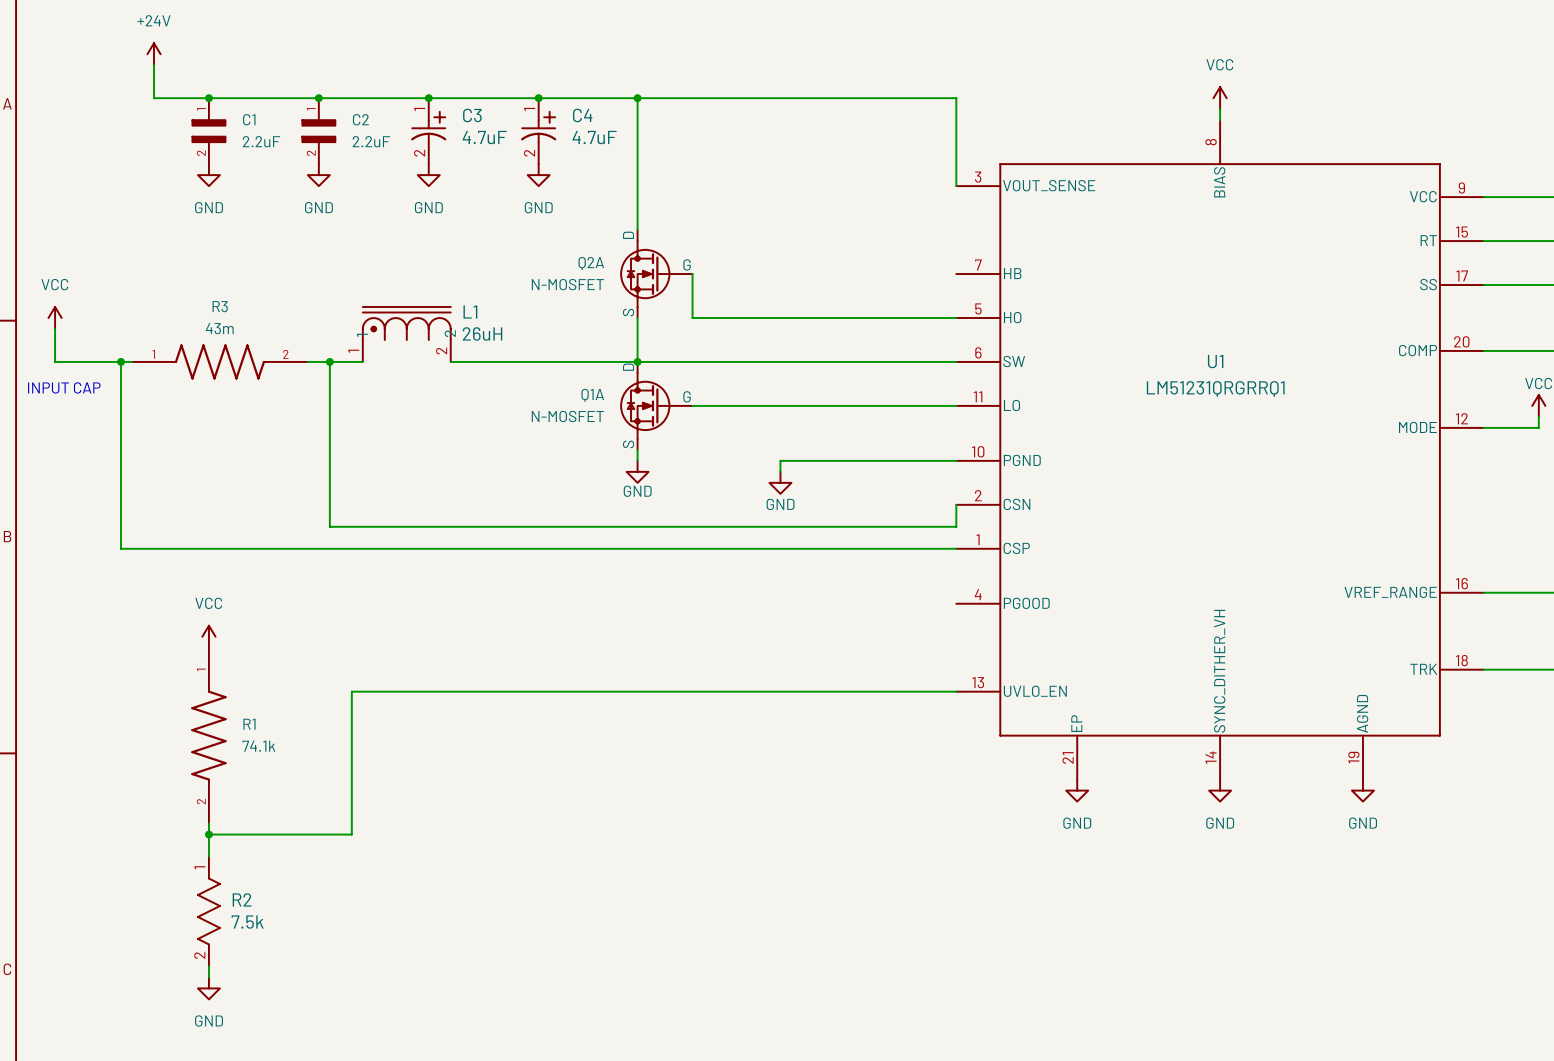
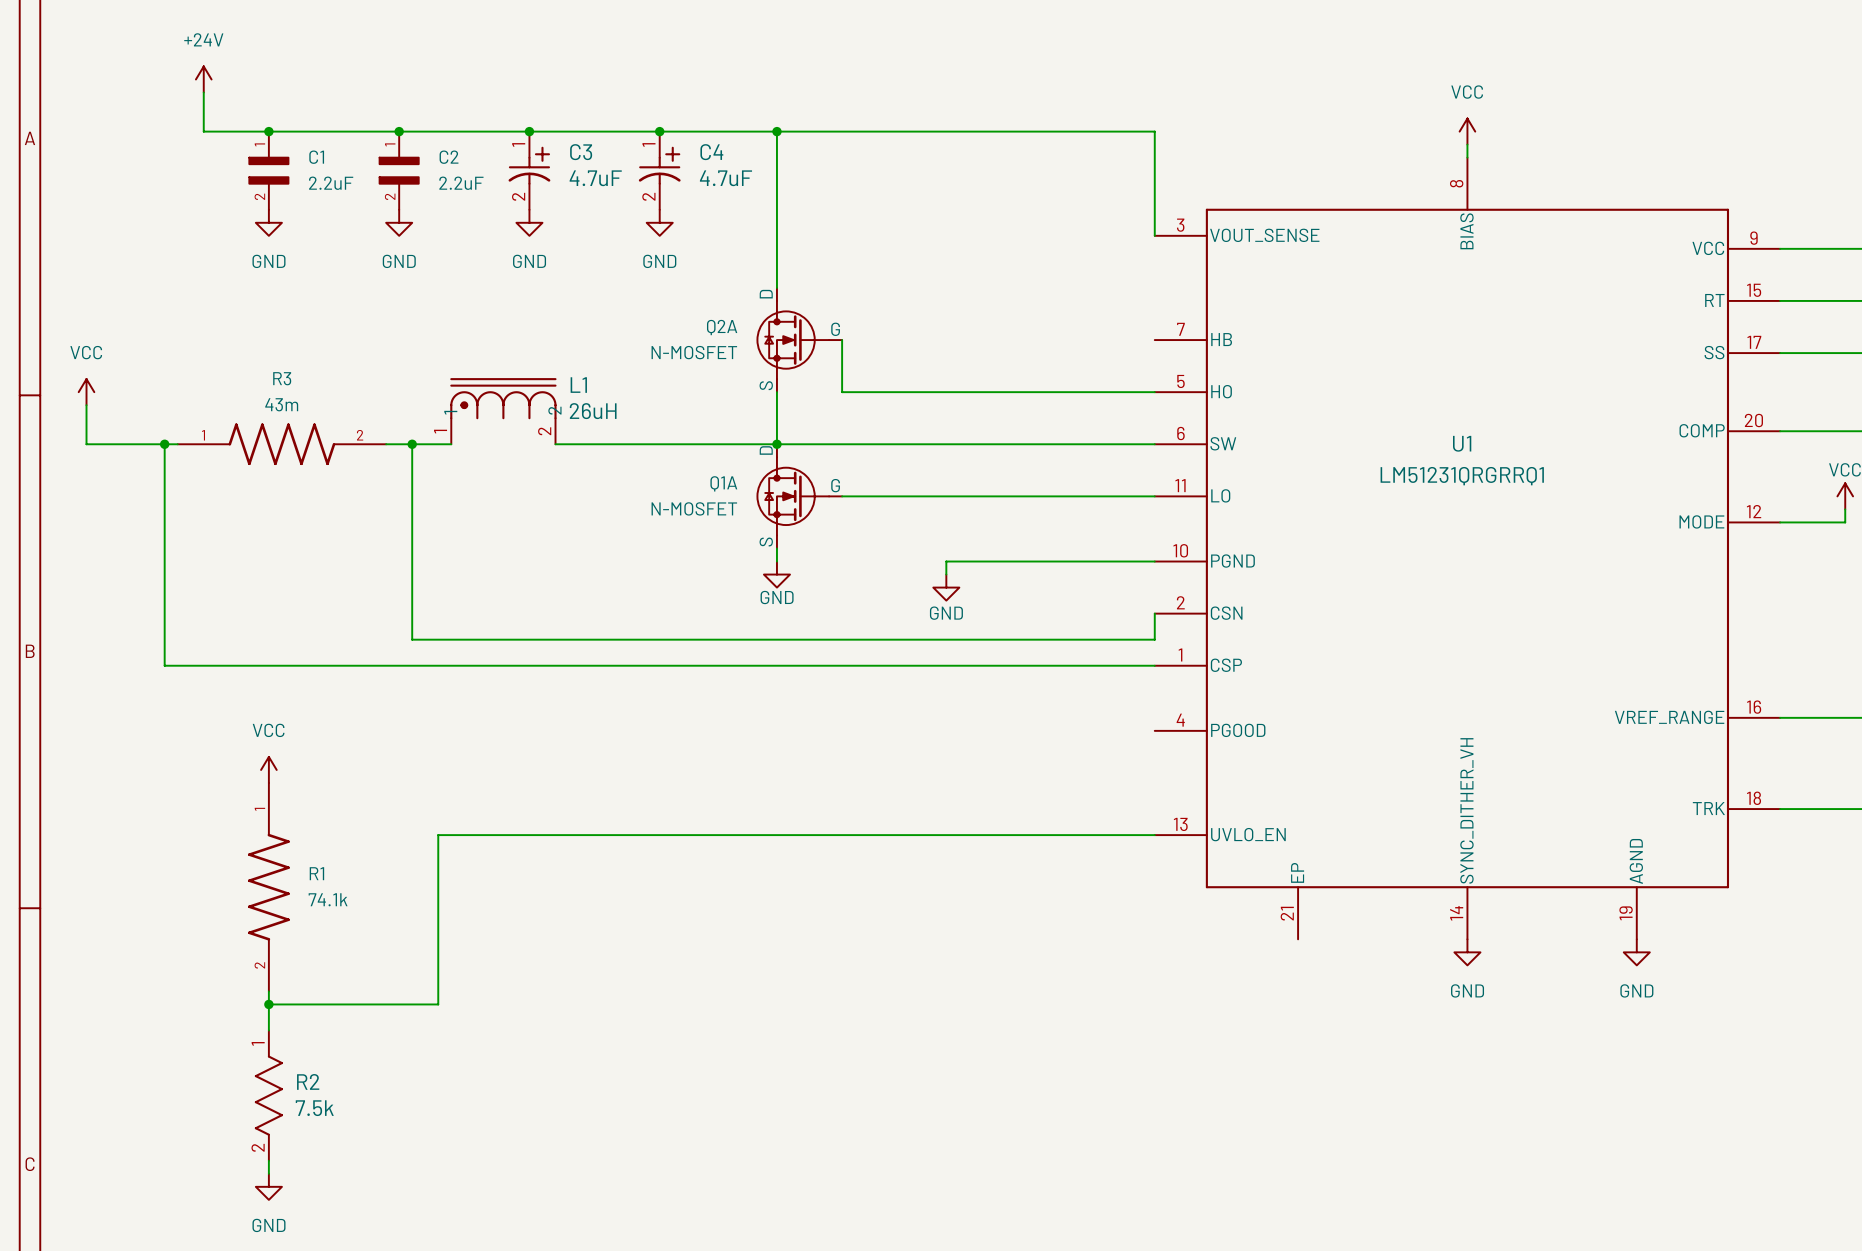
text: INPUT CAP (64, 387) -> none
power symbol: GND (1077, 790) -> none

